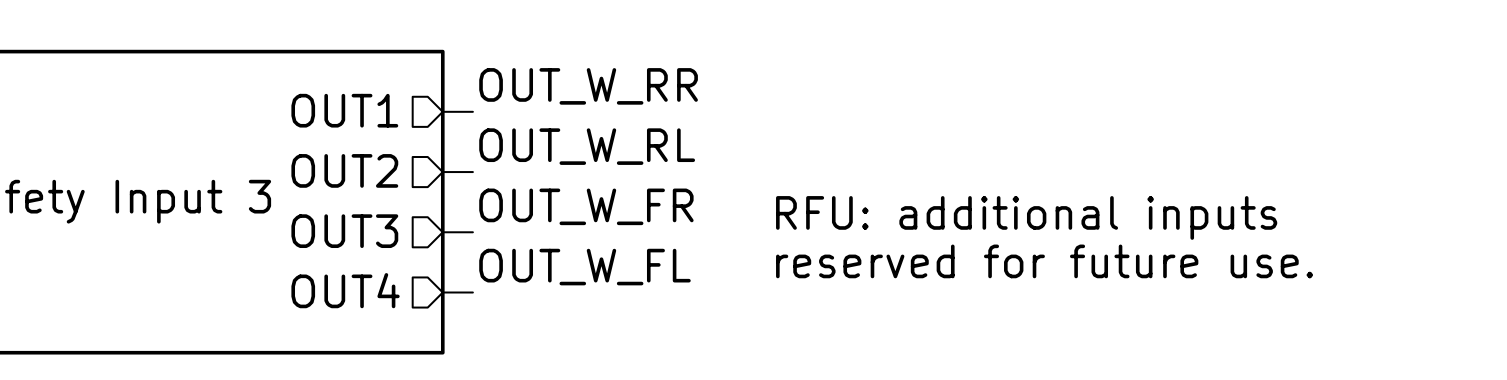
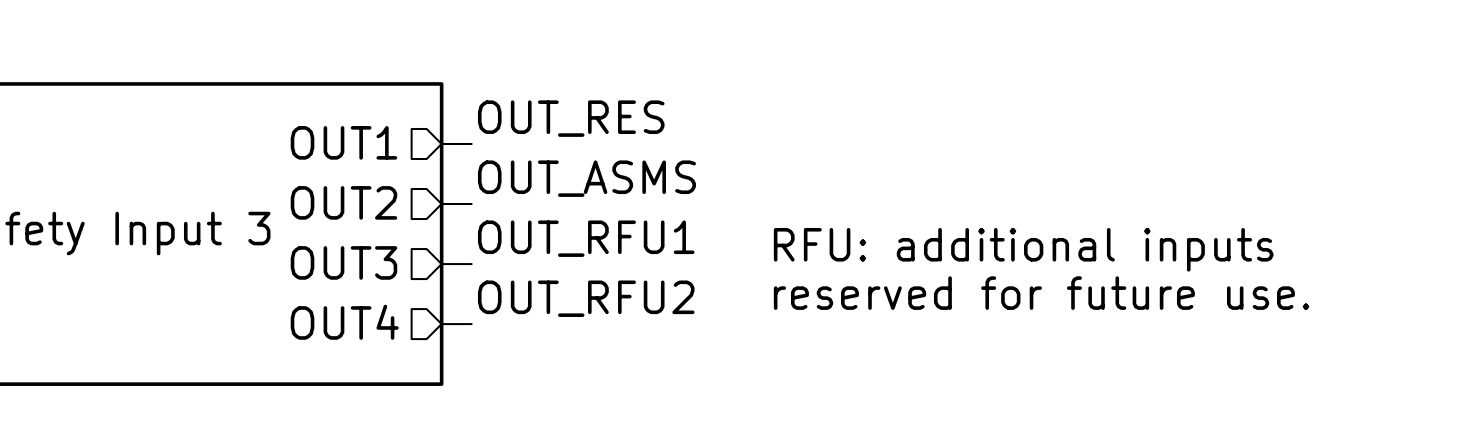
label: OUT_W_RR (588, 86) -> OUT_RES (571, 118)
label: OUT_W_RL (587, 146) -> OUT_ASMS (586, 178)
label: OUT_W_FR (586, 206) -> OUT_RFU1 (586, 238)
label: OUT_W_FL (584, 267) -> OUT_RFU2 (586, 298)

